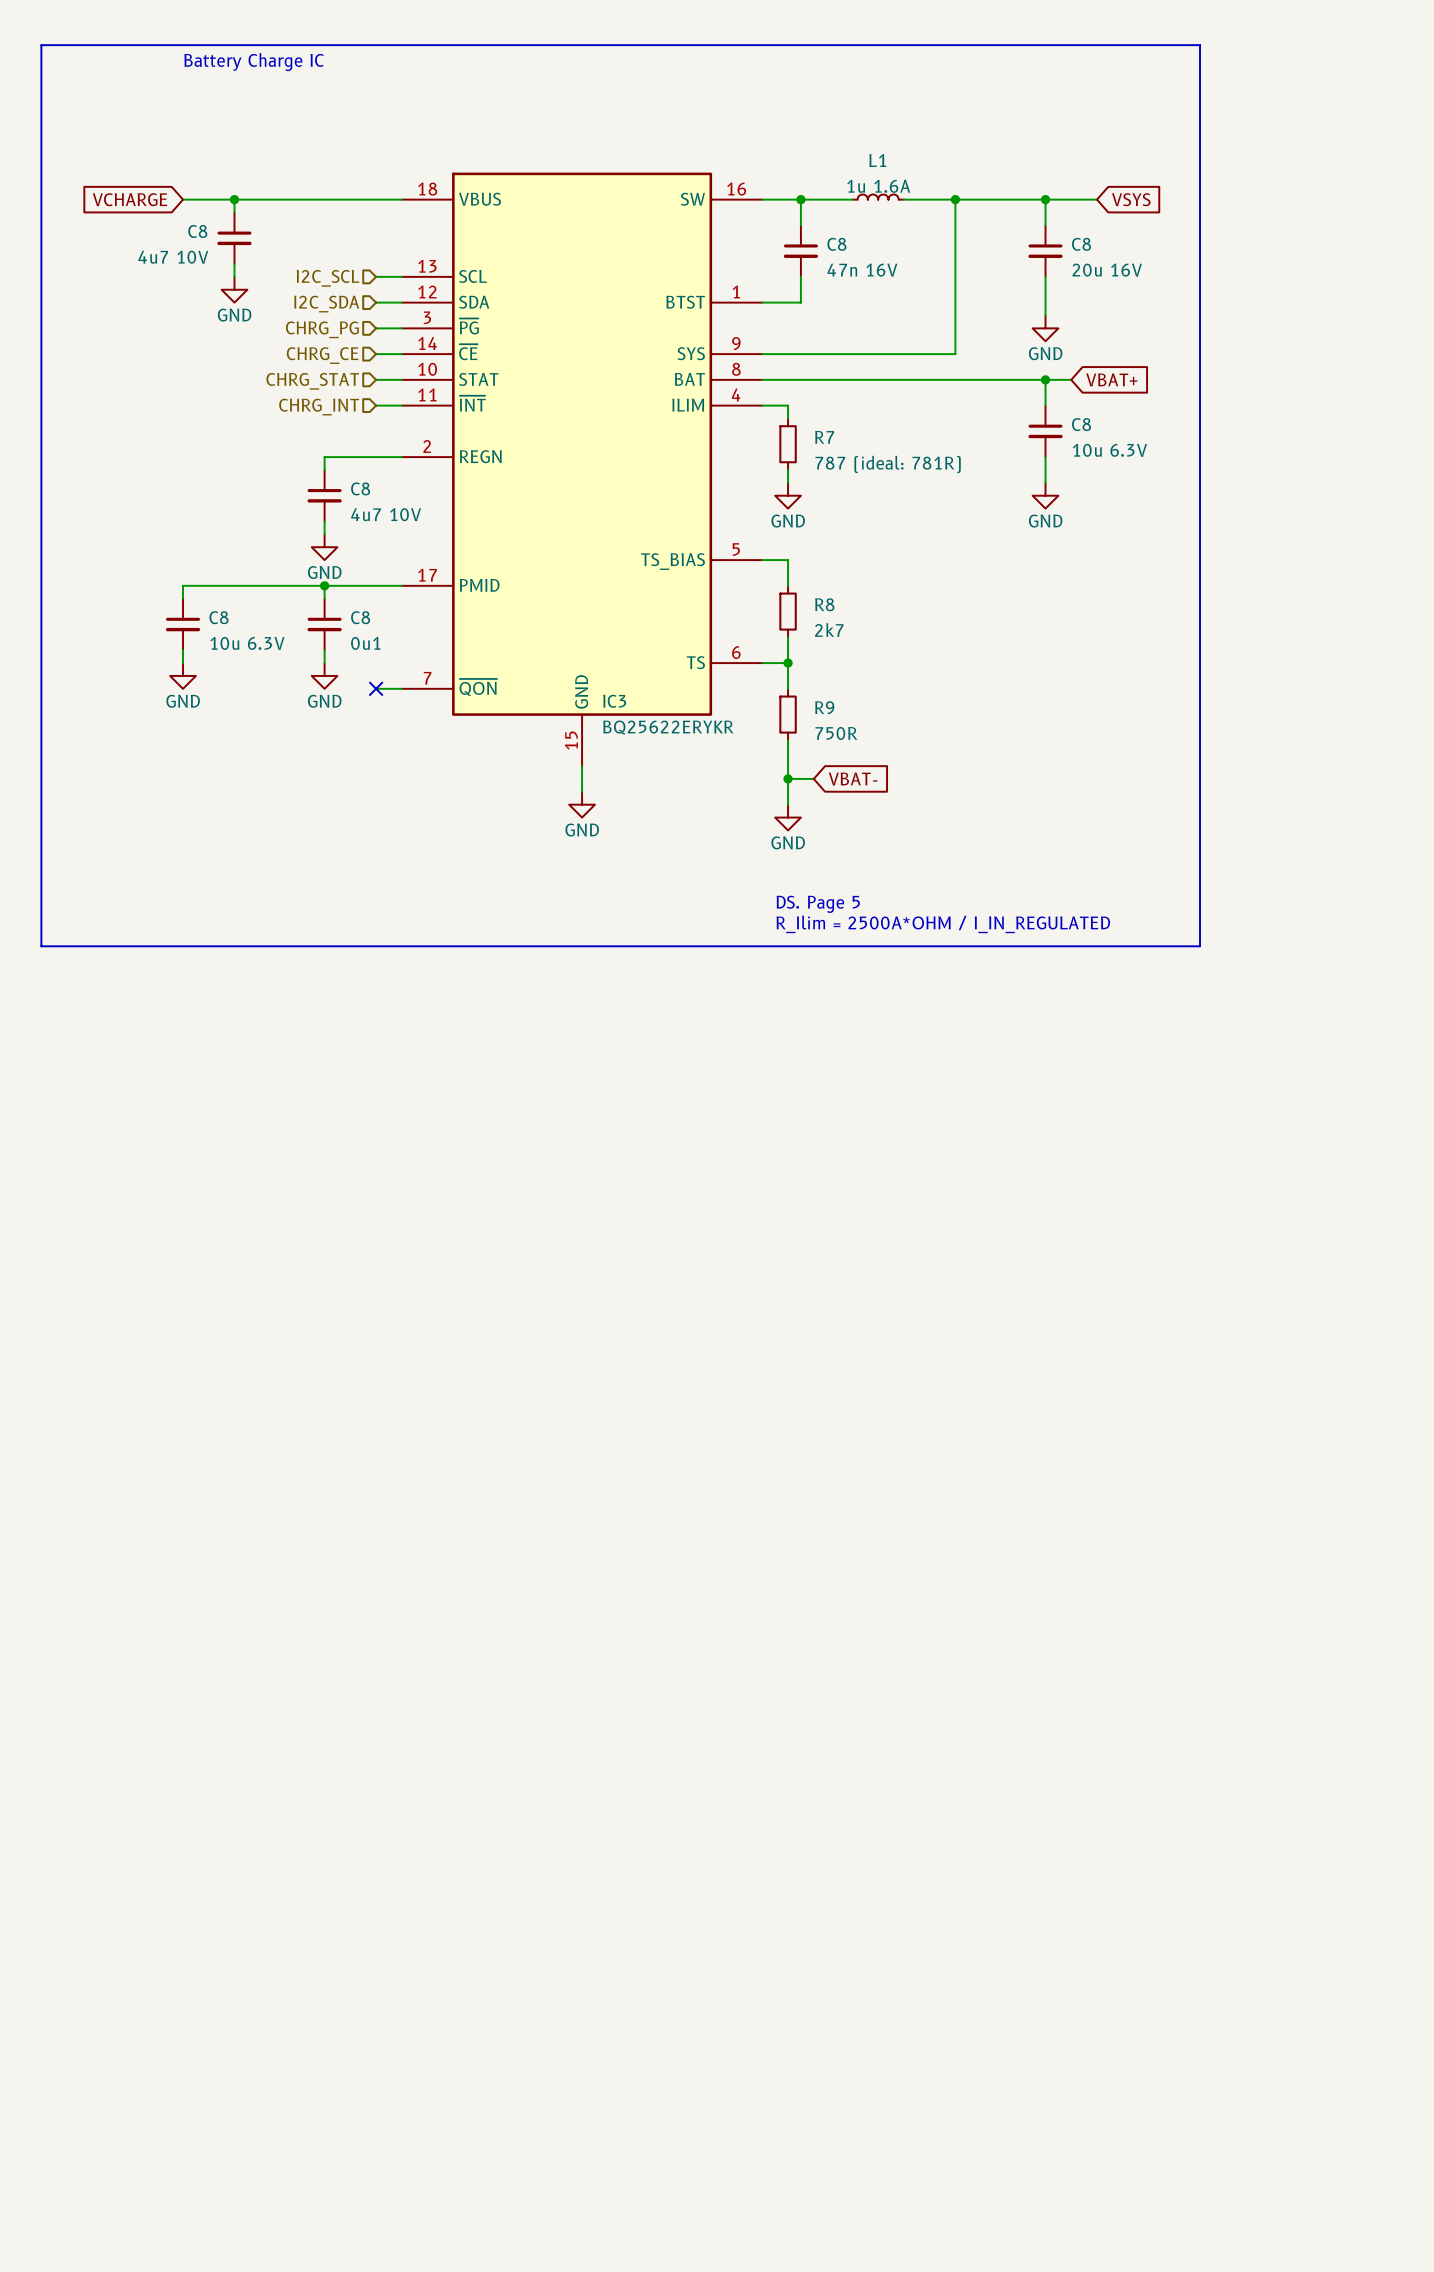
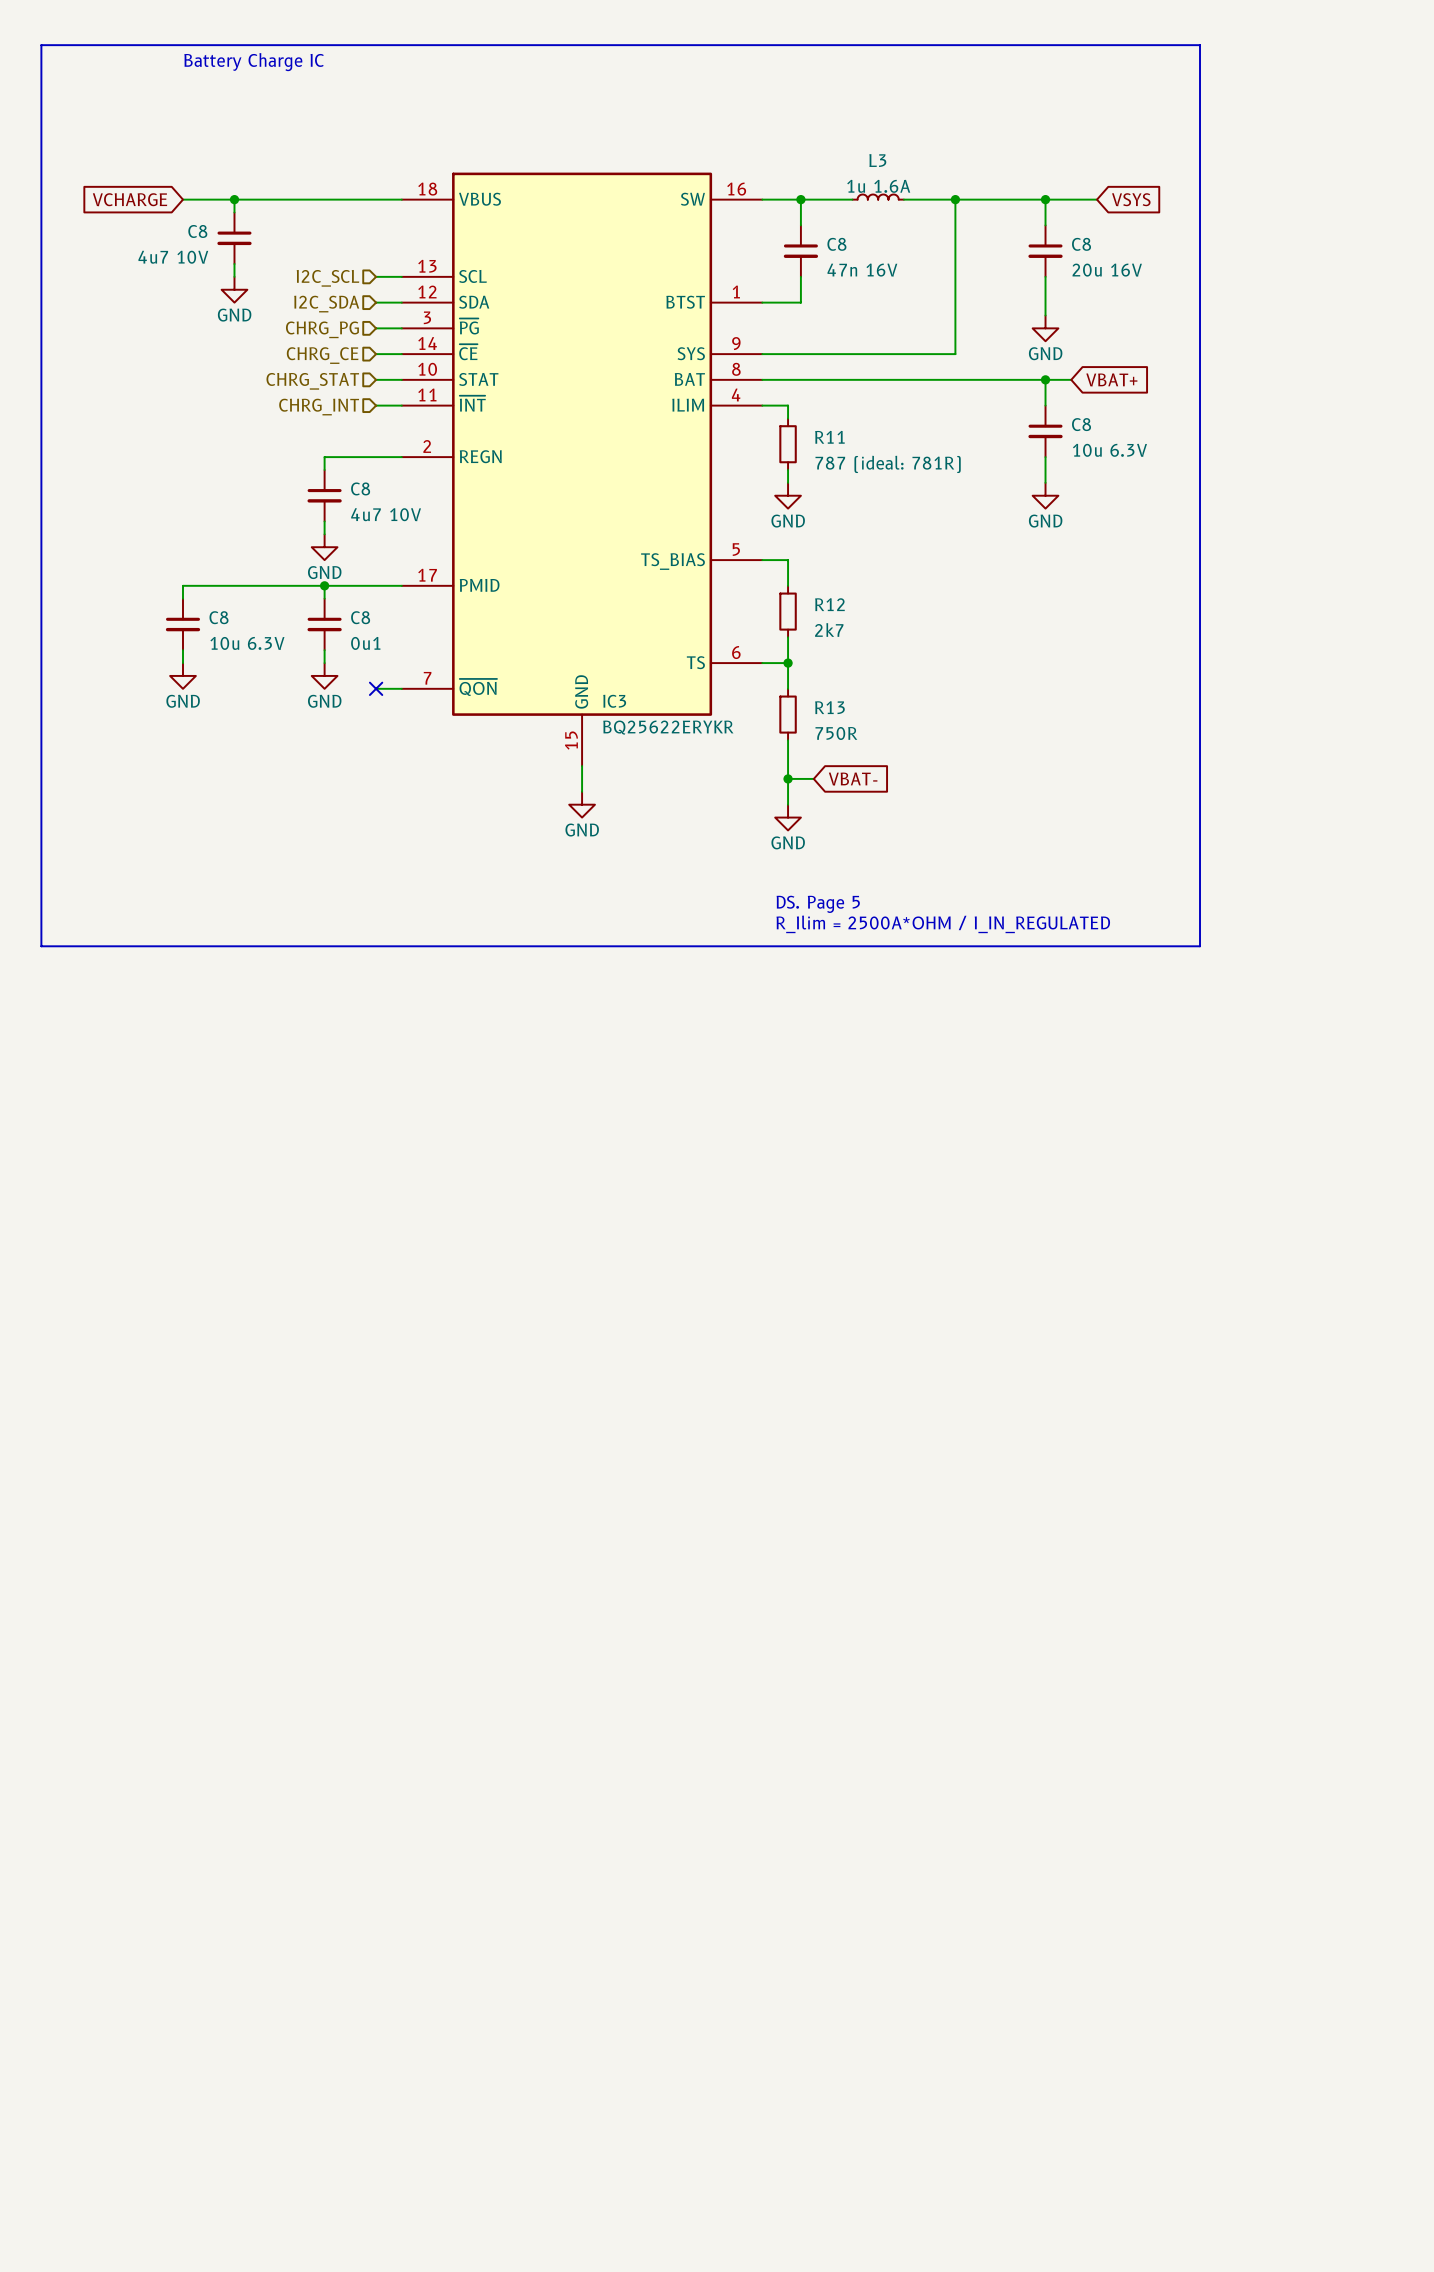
L1 name: L1 (877, 160) -> L3 (877, 160)
R7 name: R7 (824, 437) -> R11 (829, 437)
R8 name: R8 (824, 604) -> R12 (829, 604)
R9 name: R9 (824, 707) -> R13 (829, 707)

